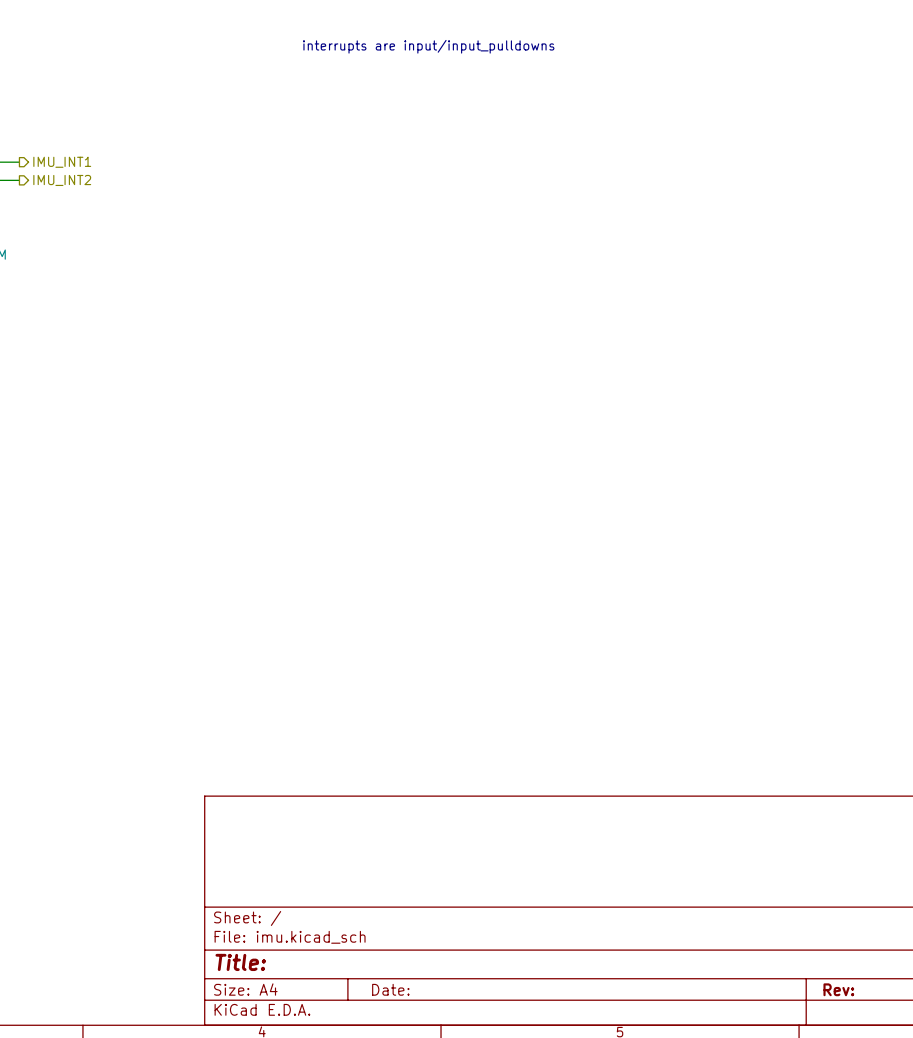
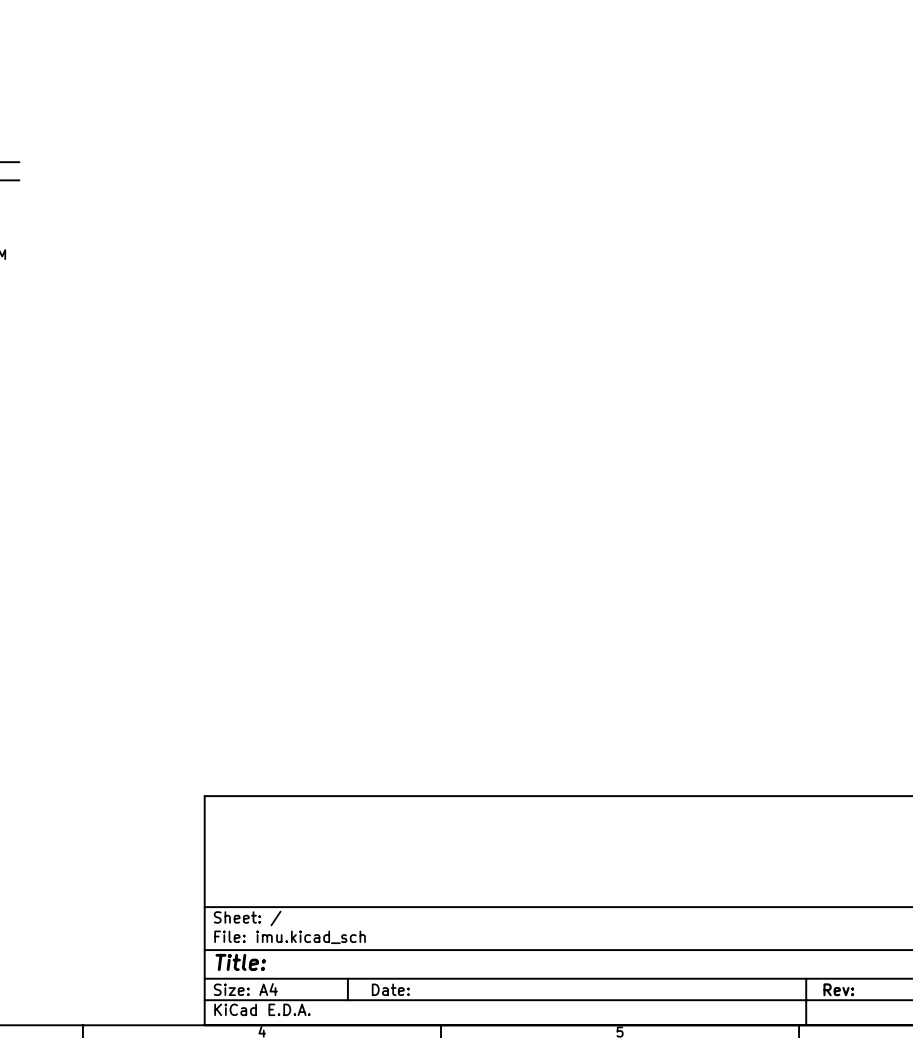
text: interrupts are input/input_pulldowns (428, 46) -> none
hierarchical label: IMU_INT1 (62, 162) -> none
hierarchical label: IMU_INT2 (62, 180) -> none

